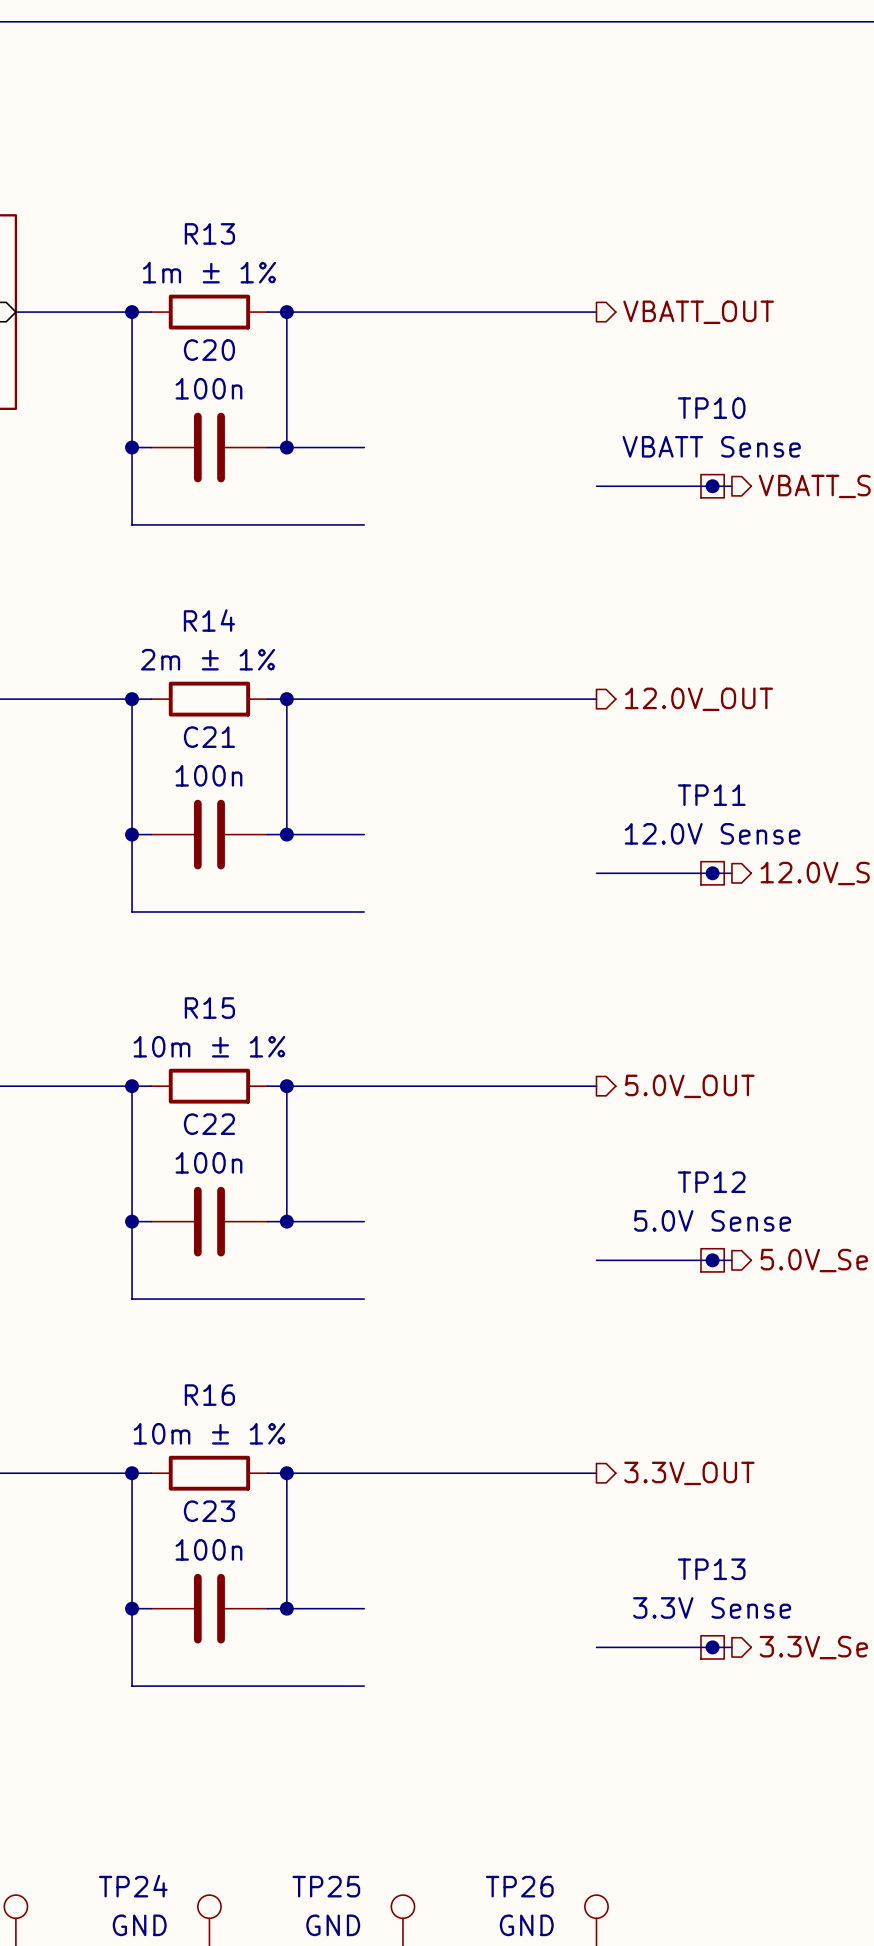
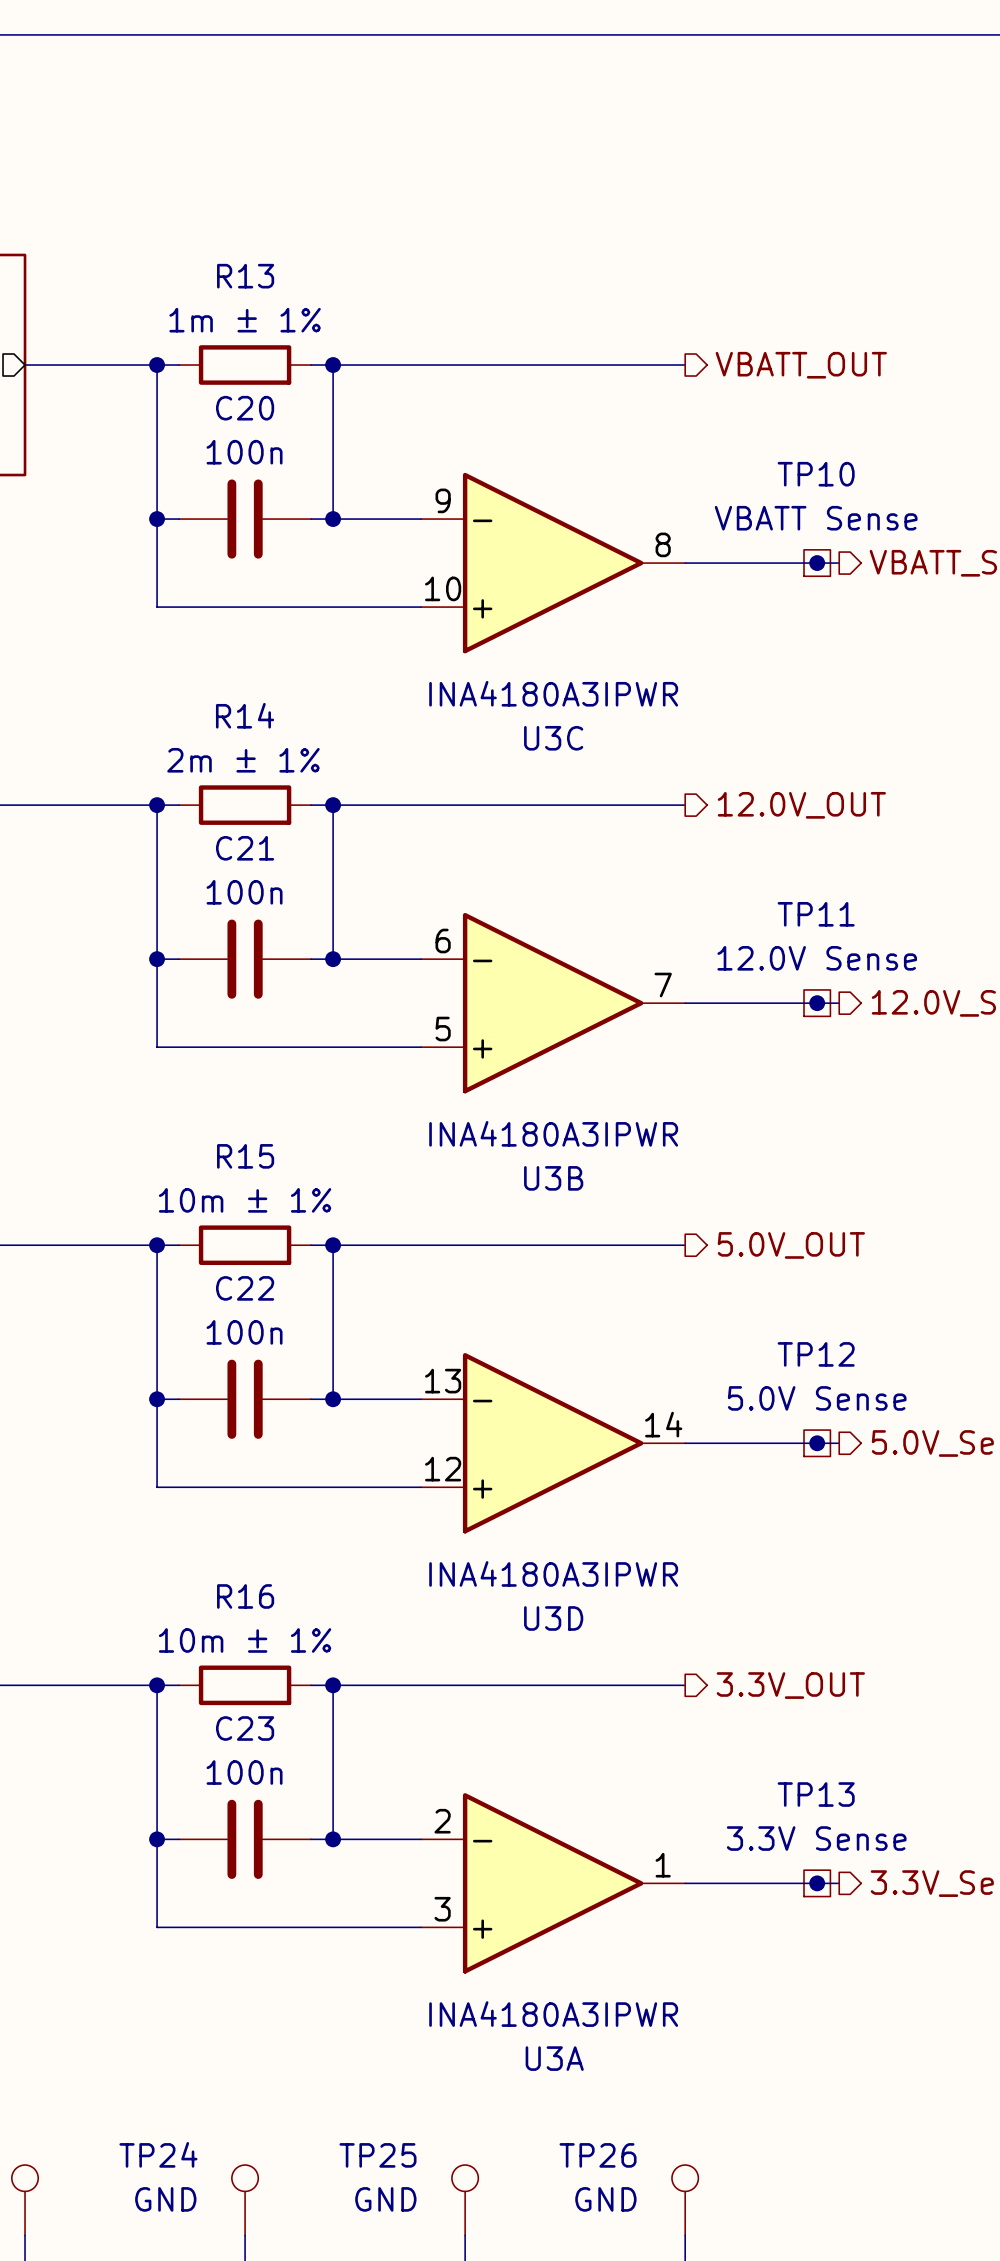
U3C: none -> INA4180A3IPWR (553, 563)
U3B: none -> INA4180A3IPWR (553, 1003)
U3D: none -> INA4180A3IPWR (553, 1443)
U3A: none -> INA4180A3IPWR (553, 1883)

